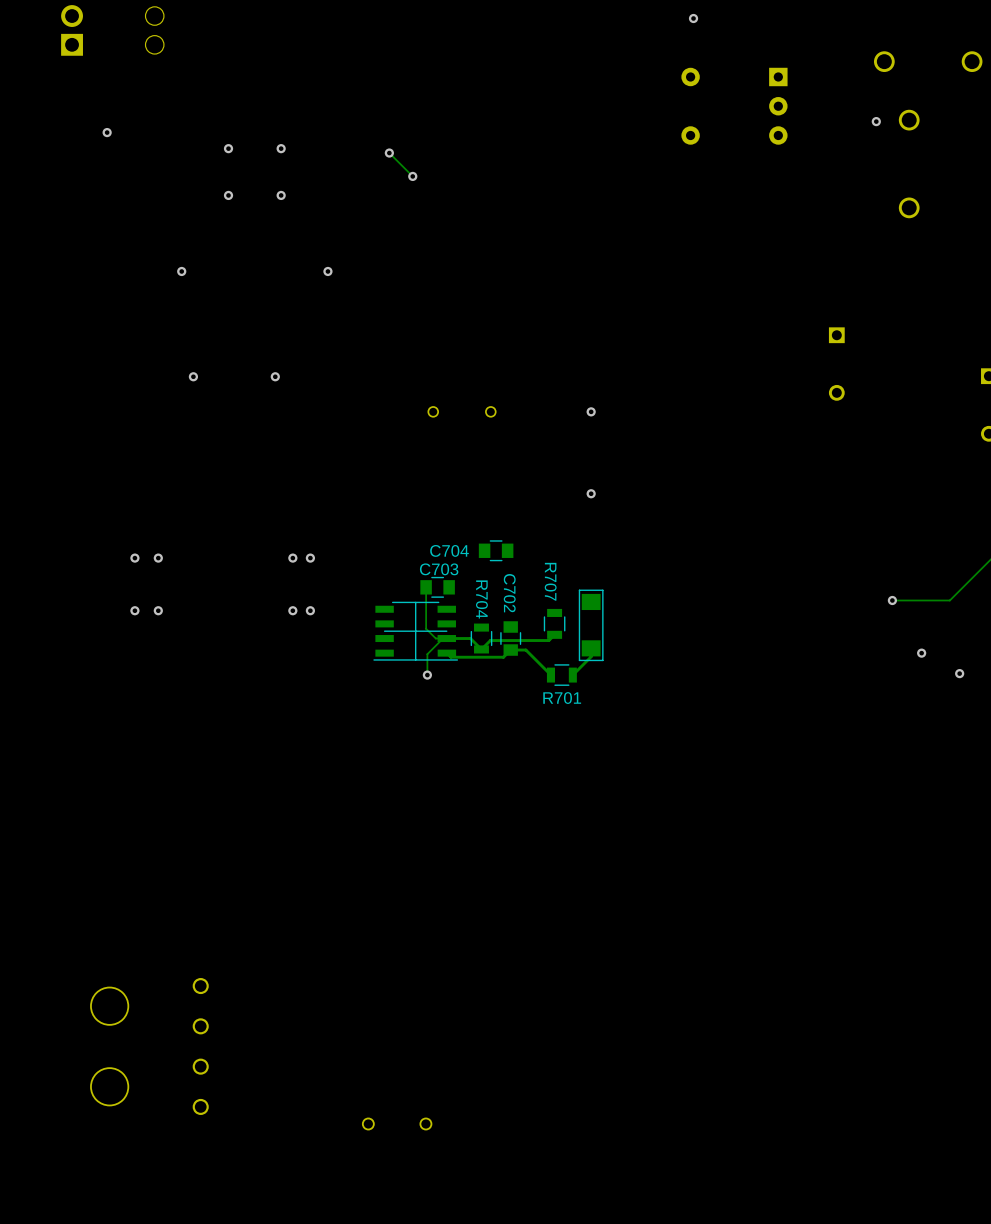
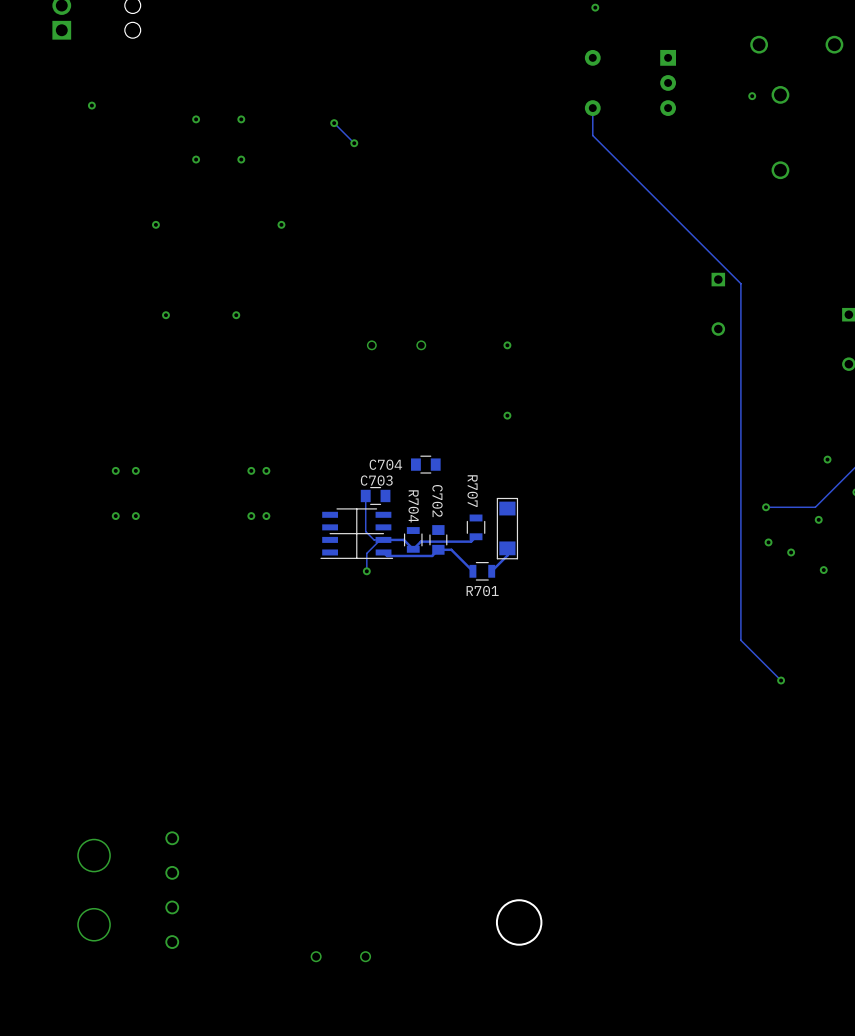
track: none -> (592, 108) (592, 135) (740, 283) (740, 640) (781, 680)
via: none -> (827, 459)
via: none -> (818, 519)
via: none -> (768, 542)
via: none -> (781, 680)
round board edge: none -> [495, 899, 543, 946]

